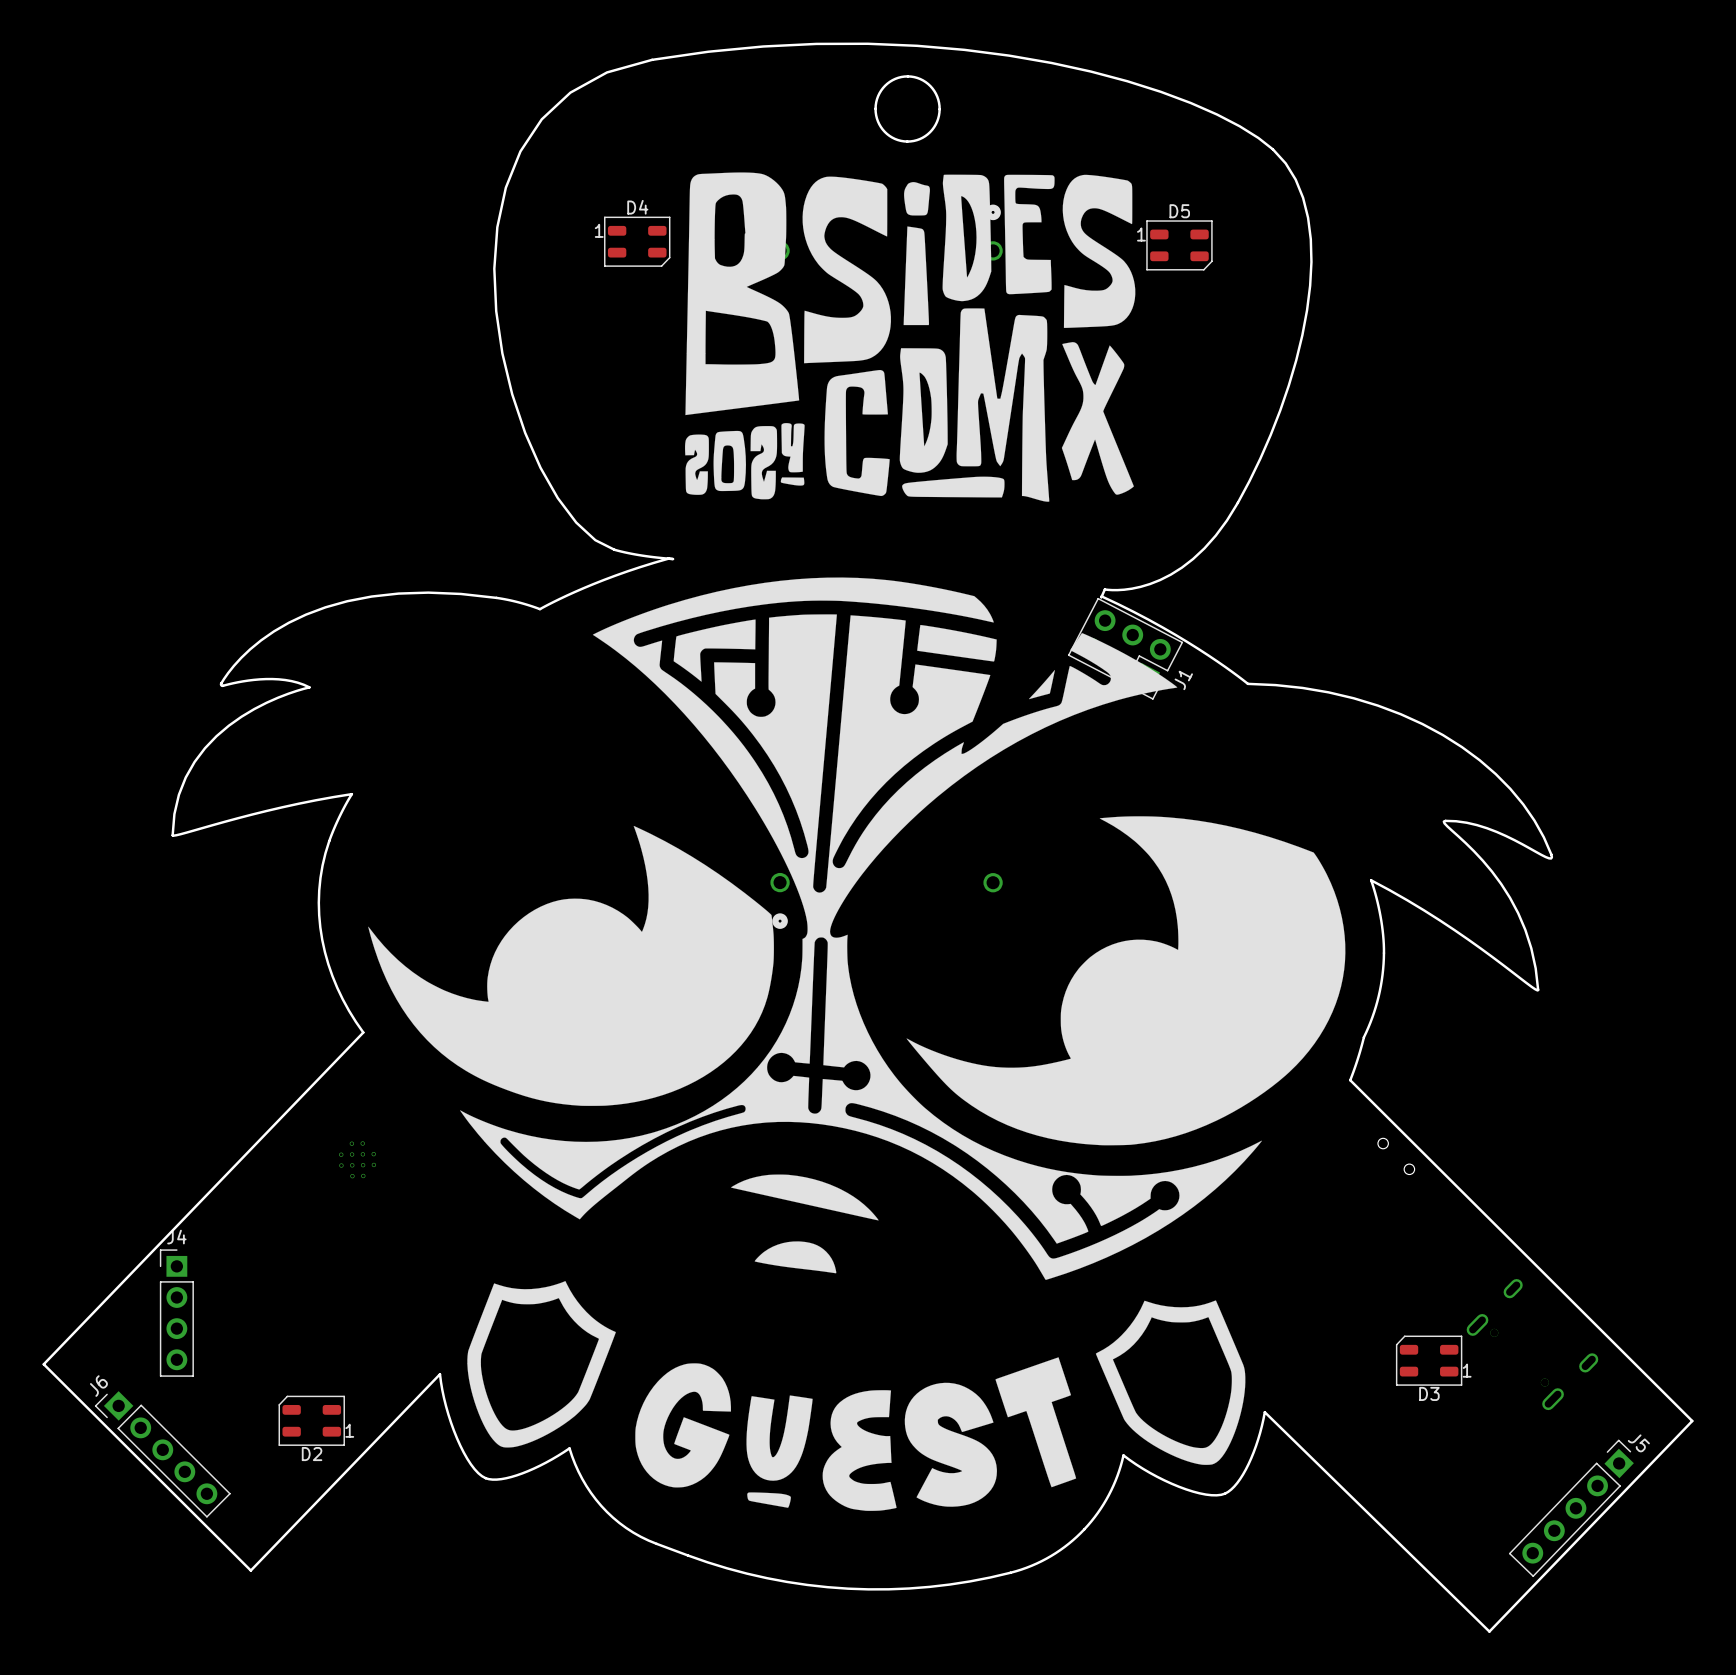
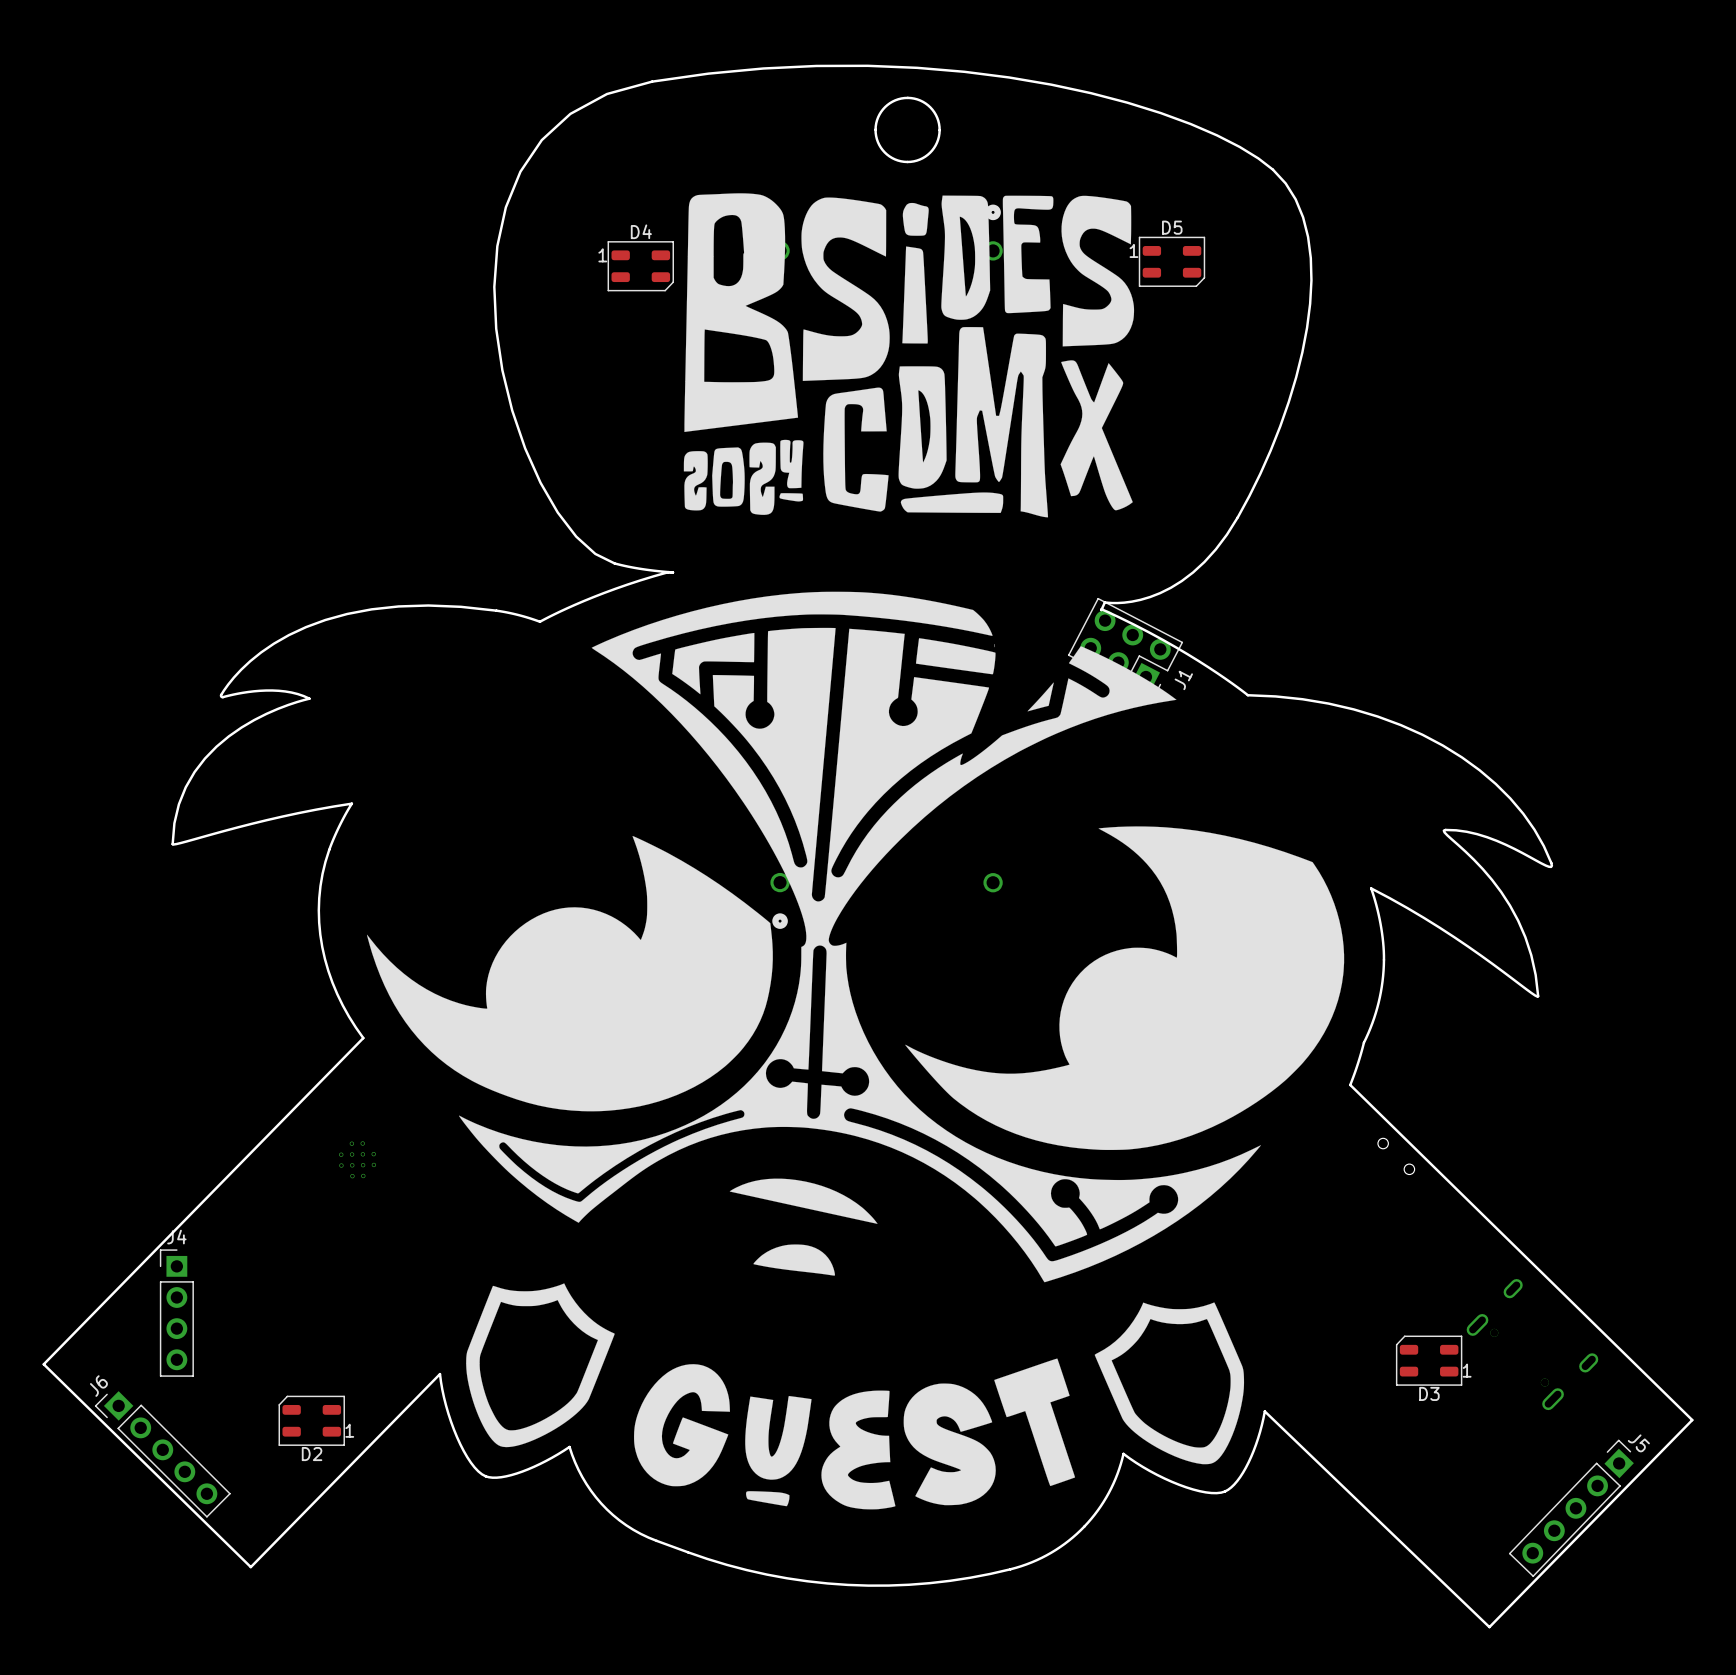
board edge: (652, 59) (607, 72) (570, 92) (541, 119) (520, 151) (505, 187) (497, 227) (494, 268) (496, 311) (502, 353) (512, 394) (525, 432) (540, 467) (557, 498) (576, 522) (595, 540) (621, 551) (673, 559) (654, 562) (603, 579) (539, 609) (496, 597) (428, 592) (398, 593) (347, 601) (306, 614) (274, 631) (250, 649) (228, 673) (221, 683) (221, 685) (248, 680) (272, 679) (291, 681) (309, 687) (278, 697) (254, 709) (228, 725) (204, 748) (185, 777) (178, 794) (174, 814) (172, 835) (282, 807) (351, 794) (336, 823) (325, 853) (320, 877) (319, 915) (322, 939) (332, 976) (342, 999) (363, 1032) (43, 1364) (250, 1570) (439, 1374) (446, 1406) (457, 1438) (470, 1464) (485, 1478) (501, 1479) (522, 1473) (546, 1462) (569, 1448) (582, 1478) (595, 1499) (619, 1523) (640, 1536) (707, 1562) (746, 1573) (787, 1581) (847, 1588) (909, 1588) (949, 1584) (1010, 1572) (1041, 1561) (1068, 1543) (1094, 1517) (1113, 1485) (1123, 1455) (1149, 1472) (1179, 1486) (1205, 1494) (1225, 1493) (1237, 1483) (1248, 1464) (1258, 1439) (1264, 1412) (1489, 1631) (1692, 1421) (1350, 1080) (1375, 1006) (1383, 969) (1382, 925) (1371, 880) (1439, 920) (1537, 990) (1531, 948) (1525, 929) (1509, 897) (1482, 860) (1443, 821) (1456, 821) (1477, 825) (1505, 835) (1545, 857) (1551, 858) (1551, 854) (1534, 820) (1510, 788) (1479, 760) (1442, 735) (1400, 714) (1353, 698) (1302, 687) (1247, 683) (1175, 634) (1133, 611) (1101, 597) (1104, 589) (1131, 588) (1160, 580) (1193, 559) (1215, 535) (1226, 520) (1260, 458) (1288, 385) (1307, 310) (1311, 262) (1310, 239) (1303, 197) (1295, 179) (1285, 163) (1272, 149) (1239, 126) (1217, 114) (1160, 91) (1127, 81) (1051, 62) (964, 49) (867, 43) (763, 46) (652, 59) -> (652, 81) (607, 94) (570, 113) (541, 140) (520, 171) (505, 207) (497, 246) (494, 287) (496, 328) (502, 370) (512, 410) (525, 448) (540, 482) (557, 512) (576, 536) (595, 553) (621, 565) (673, 572) (654, 576) (603, 593) (539, 621) (496, 610) (428, 605) (398, 606) (347, 613) (306, 627) (274, 643) (250, 661) (228, 684) (221, 694) (221, 697) (248, 692) (272, 690) (291, 692) (309, 698) (278, 708) (254, 720) (228, 736) (204, 758) (185, 787) (178, 804) (174, 823) (172, 844) (282, 816) (351, 803) (336, 832) (325, 861) (320, 886) (319, 922) (322, 946) (332, 982) (342, 1005) (363, 1038) (43, 1364) (250, 1567) (439, 1374) (446, 1405) (457, 1437) (470, 1462) (485, 1476) (501, 1477) (522, 1471) (546, 1460) (569, 1446) (582, 1476) (595, 1497) (619, 1520) (640, 1533) (707, 1558) (746, 1570) (787, 1578) (847, 1584) (909, 1584) (949, 1580) (1010, 1569) (1041, 1557) (1068, 1540) (1094, 1514) (1113, 1483) (1123, 1453) (1149, 1471) (1179, 1484) (1205, 1492) (1225, 1491) (1237, 1481) (1248, 1462) (1258, 1438) (1264, 1411) (1489, 1627) (1692, 1420) (1350, 1084) (1375, 1012) (1383, 976) (1382, 932) (1371, 888) (1439, 927) (1537, 996) (1531, 955) (1525, 937) (1509, 905) (1482, 869) (1443, 830) (1456, 830) (1477, 834) (1505, 844) (1545, 865) (1551, 866) (1551, 863) (1534, 829) (1510, 798) (1479, 770) (1442, 745) (1400, 725) (1353, 709) (1302, 699) (1247, 695) (1175, 647) (1133, 624) (1101, 610) (1104, 602) (1131, 601) (1160, 593) (1193, 572) (1215, 549) (1226, 534) (1260, 473) (1288, 401) (1307, 327) (1311, 280) (1310, 258) (1303, 217) (1295, 199) (1285, 183) (1272, 169) (1239, 146) (1217, 135) (1160, 113) (1127, 102) (1051, 84) (964, 71) (867, 65) (763, 68) (652, 81)
board edge: (907, 76) (895, 78) (885, 85) (878, 96) (875, 108) (877, 121) (884, 131) (894, 138) (907, 141) (919, 139) (930, 132) (937, 121) (939, 109) (937, 96) (930, 86) (920, 79) (907, 76) -> (907, 97) (895, 100) (885, 107) (878, 117) (875, 129) (877, 142) (884, 152) (894, 159) (907, 161) (919, 159) (930, 152) (937, 142) (939, 130) (937, 117) (930, 107) (920, 100) (907, 97)
drawing shape: [368, 172, 1346, 1511] -> [366, 193, 1345, 1510]
D4 position: (637, 241) -> (640, 266)
D5 position: (1179, 245) -> (1171, 261)

